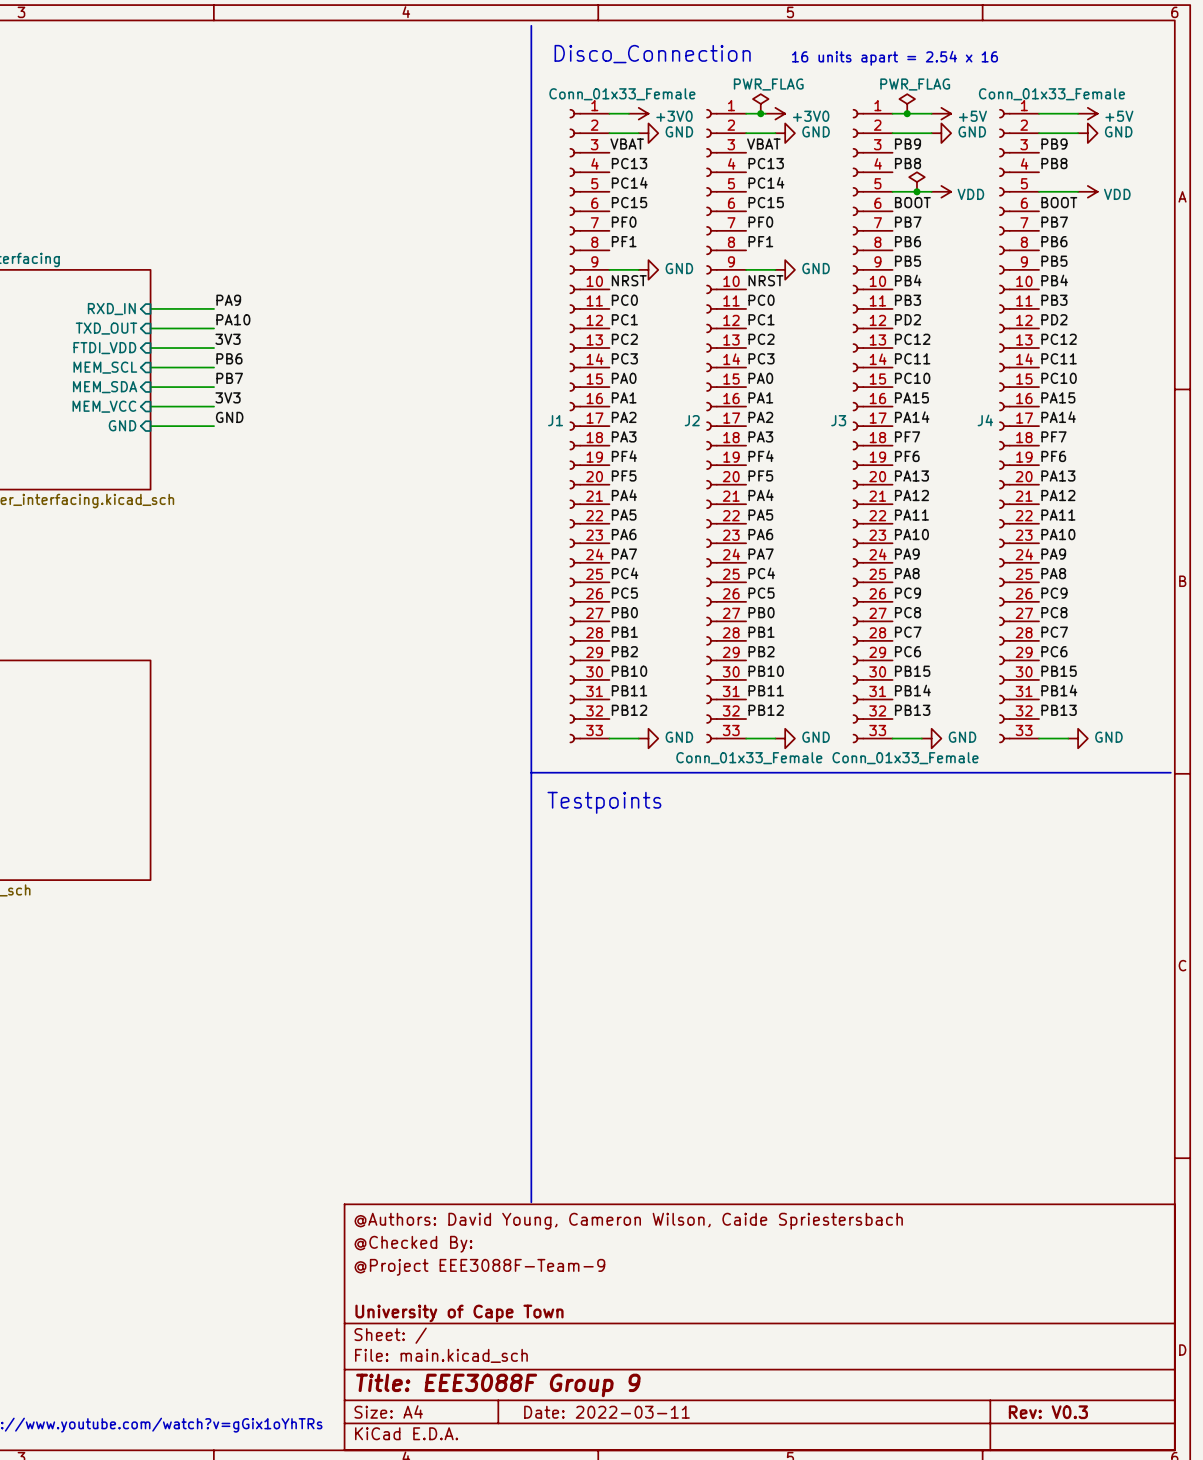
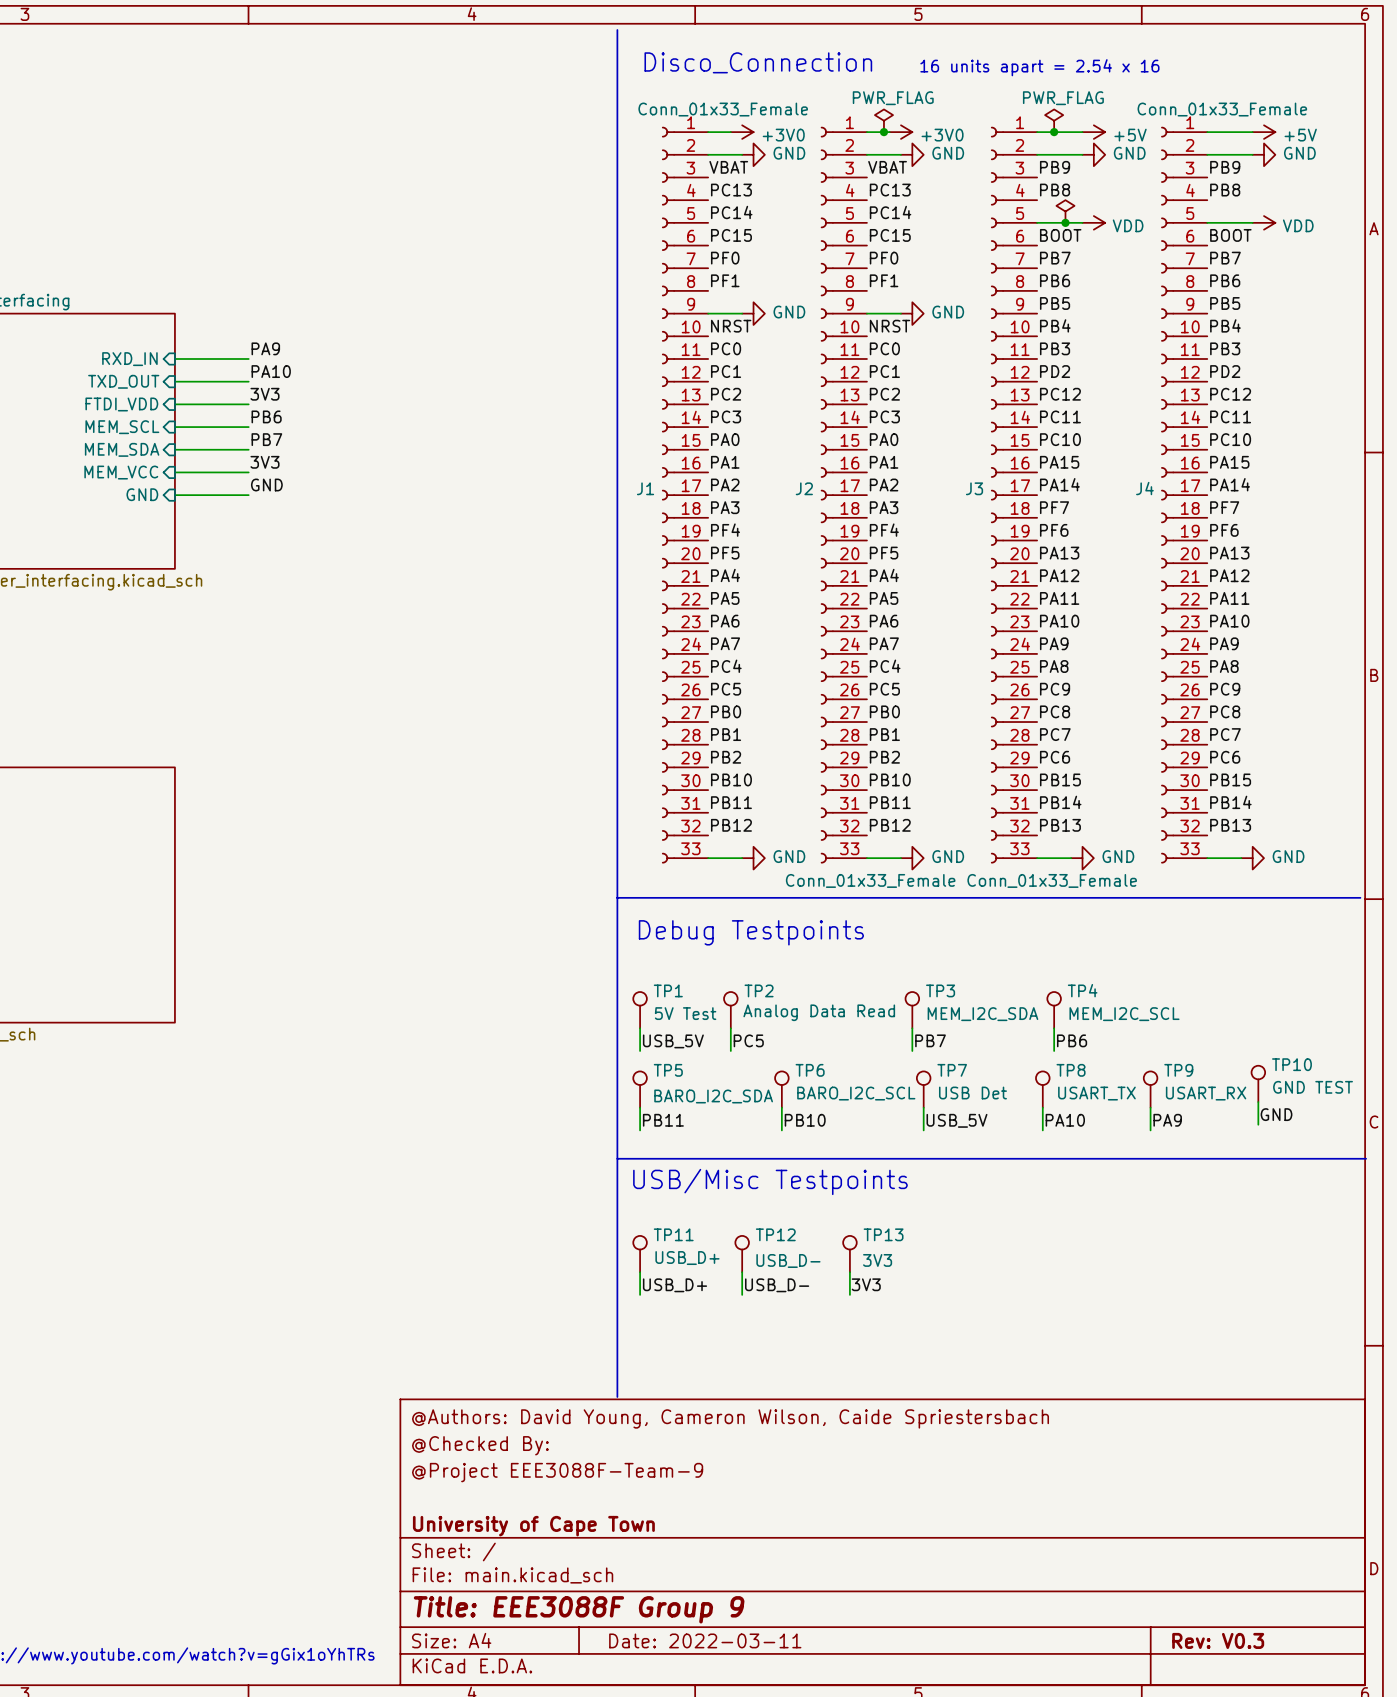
text: Testpoints (604, 802) -> Debug Testpoints (751, 932)
TP1: none -> 5V Test (640, 1010)
TP2: none -> Analog Data Read (730, 1010)
TP3: none -> MEM_I2C_SDA (912, 1010)
TP4: none -> MEM_I2C_SCL (1054, 1010)
wire: none -> (640, 1028) (640, 1050)
wire: none -> (730, 1028) (730, 1050)
wire: none -> (912, 1028) (912, 1050)
wire: none -> (1054, 1028) (1054, 1050)
label: none -> PC5 (748, 1040)
label: none -> PB7 (930, 1040)
label: none -> PB6 (1072, 1040)
label: none -> USB_5V (673, 1041)
TP10: none -> GND TEST (1258, 1083)
TP5: none -> BARO_I2C_SDA (640, 1089)
TP6: none -> BARO_I2C_SCL (781, 1089)
TP7: none -> USB Det (923, 1089)
TP8: none -> USART_TX (1042, 1089)
TP9: none -> USART_RX (1150, 1089)
wire: none -> (1258, 1102) (1258, 1124)
wire: none -> (640, 1107) (640, 1130)
wire: none -> (781, 1107) (781, 1130)
wire: none -> (923, 1107) (923, 1130)
wire: none -> (1042, 1107) (1042, 1130)
wire: none -> (1150, 1107) (1150, 1130)
label: none -> GND (1276, 1114)
label: none -> PB11 (663, 1120)
label: none -> PB10 (805, 1120)
label: none -> USB_5V (956, 1120)
label: none -> PA10 (1065, 1120)
label: none -> PA9 (1167, 1120)
line: none -> (617, 1158) (1366, 1158)
text: none -> USB/Misc Testpoints (770, 1181)
TP11: none -> USB_D+ (640, 1254)
TP12: none -> USB_D- (742, 1254)
TP13: none -> 3V3 (849, 1254)
wire: none -> (640, 1272) (640, 1294)
wire: none -> (742, 1272) (742, 1294)
wire: none -> (849, 1272) (849, 1294)
label: none -> 3V3 (866, 1284)
label: none -> USB_D+ (675, 1285)
label: none -> USB_D- (777, 1285)

